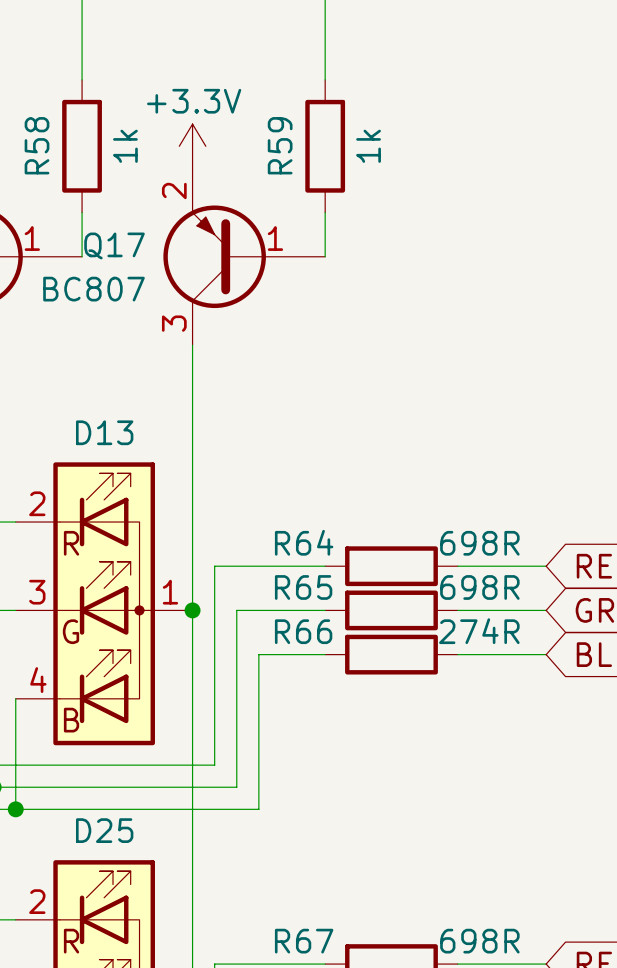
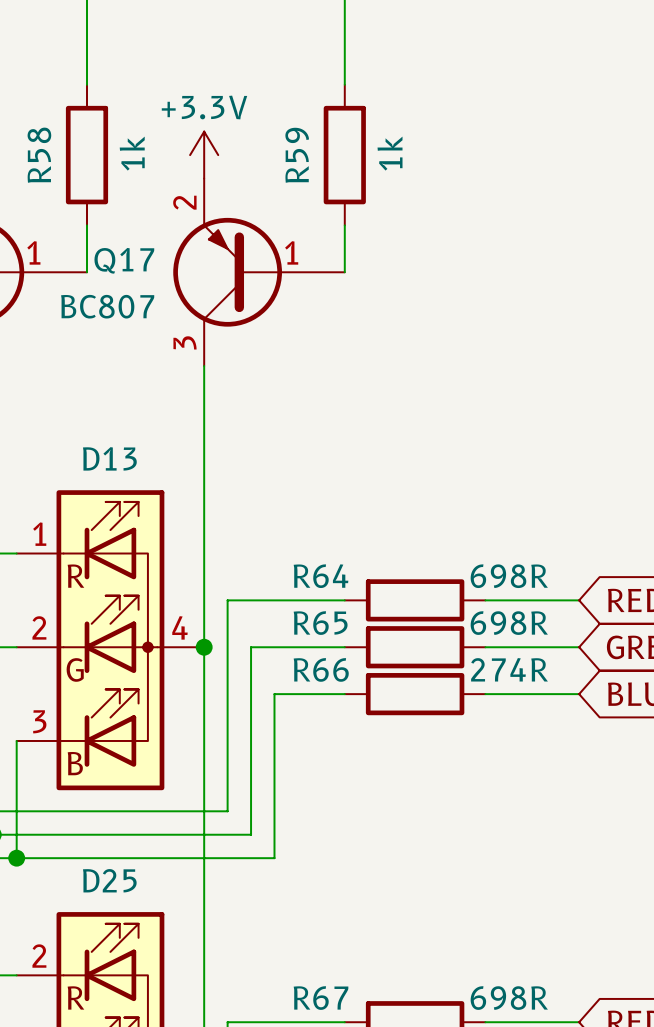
D13 pin number: 2 (37, 503) -> 1 (39, 534)
D13 pin number: 3 (37, 592) -> 2 (39, 627)
D13 pin number: 1 (170, 592) -> 4 (179, 627)
D13 pin number: 4 (38, 680) -> 3 (39, 721)

